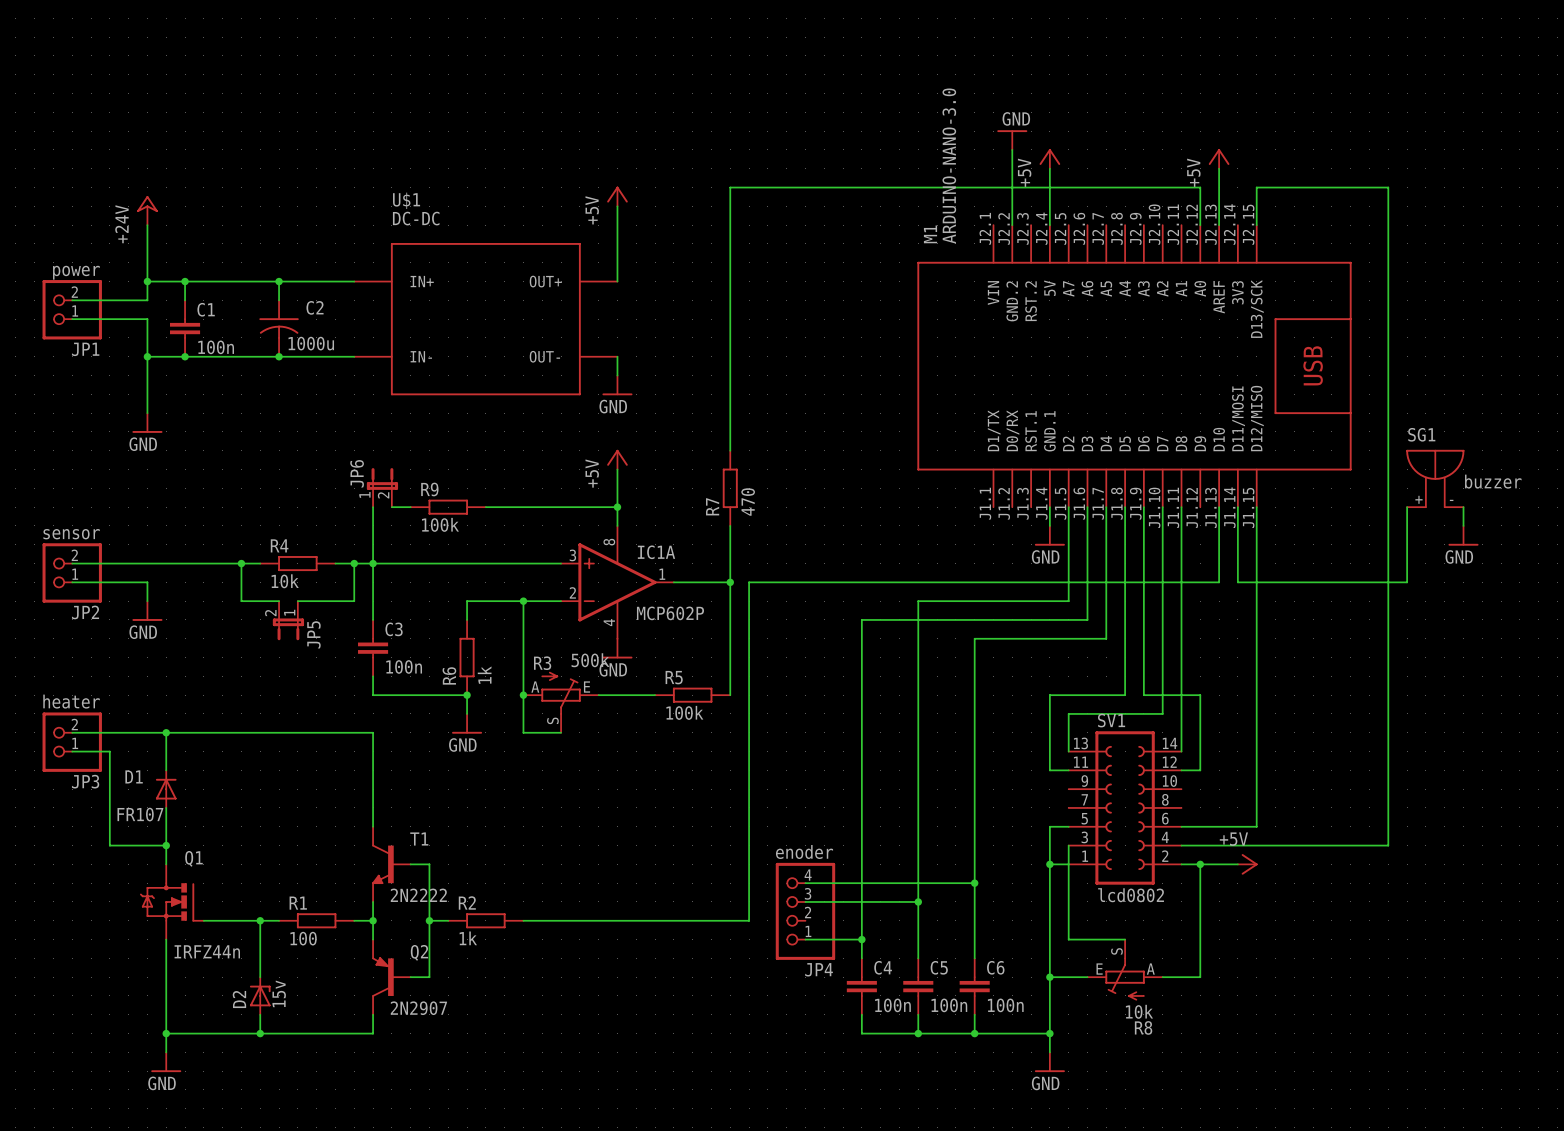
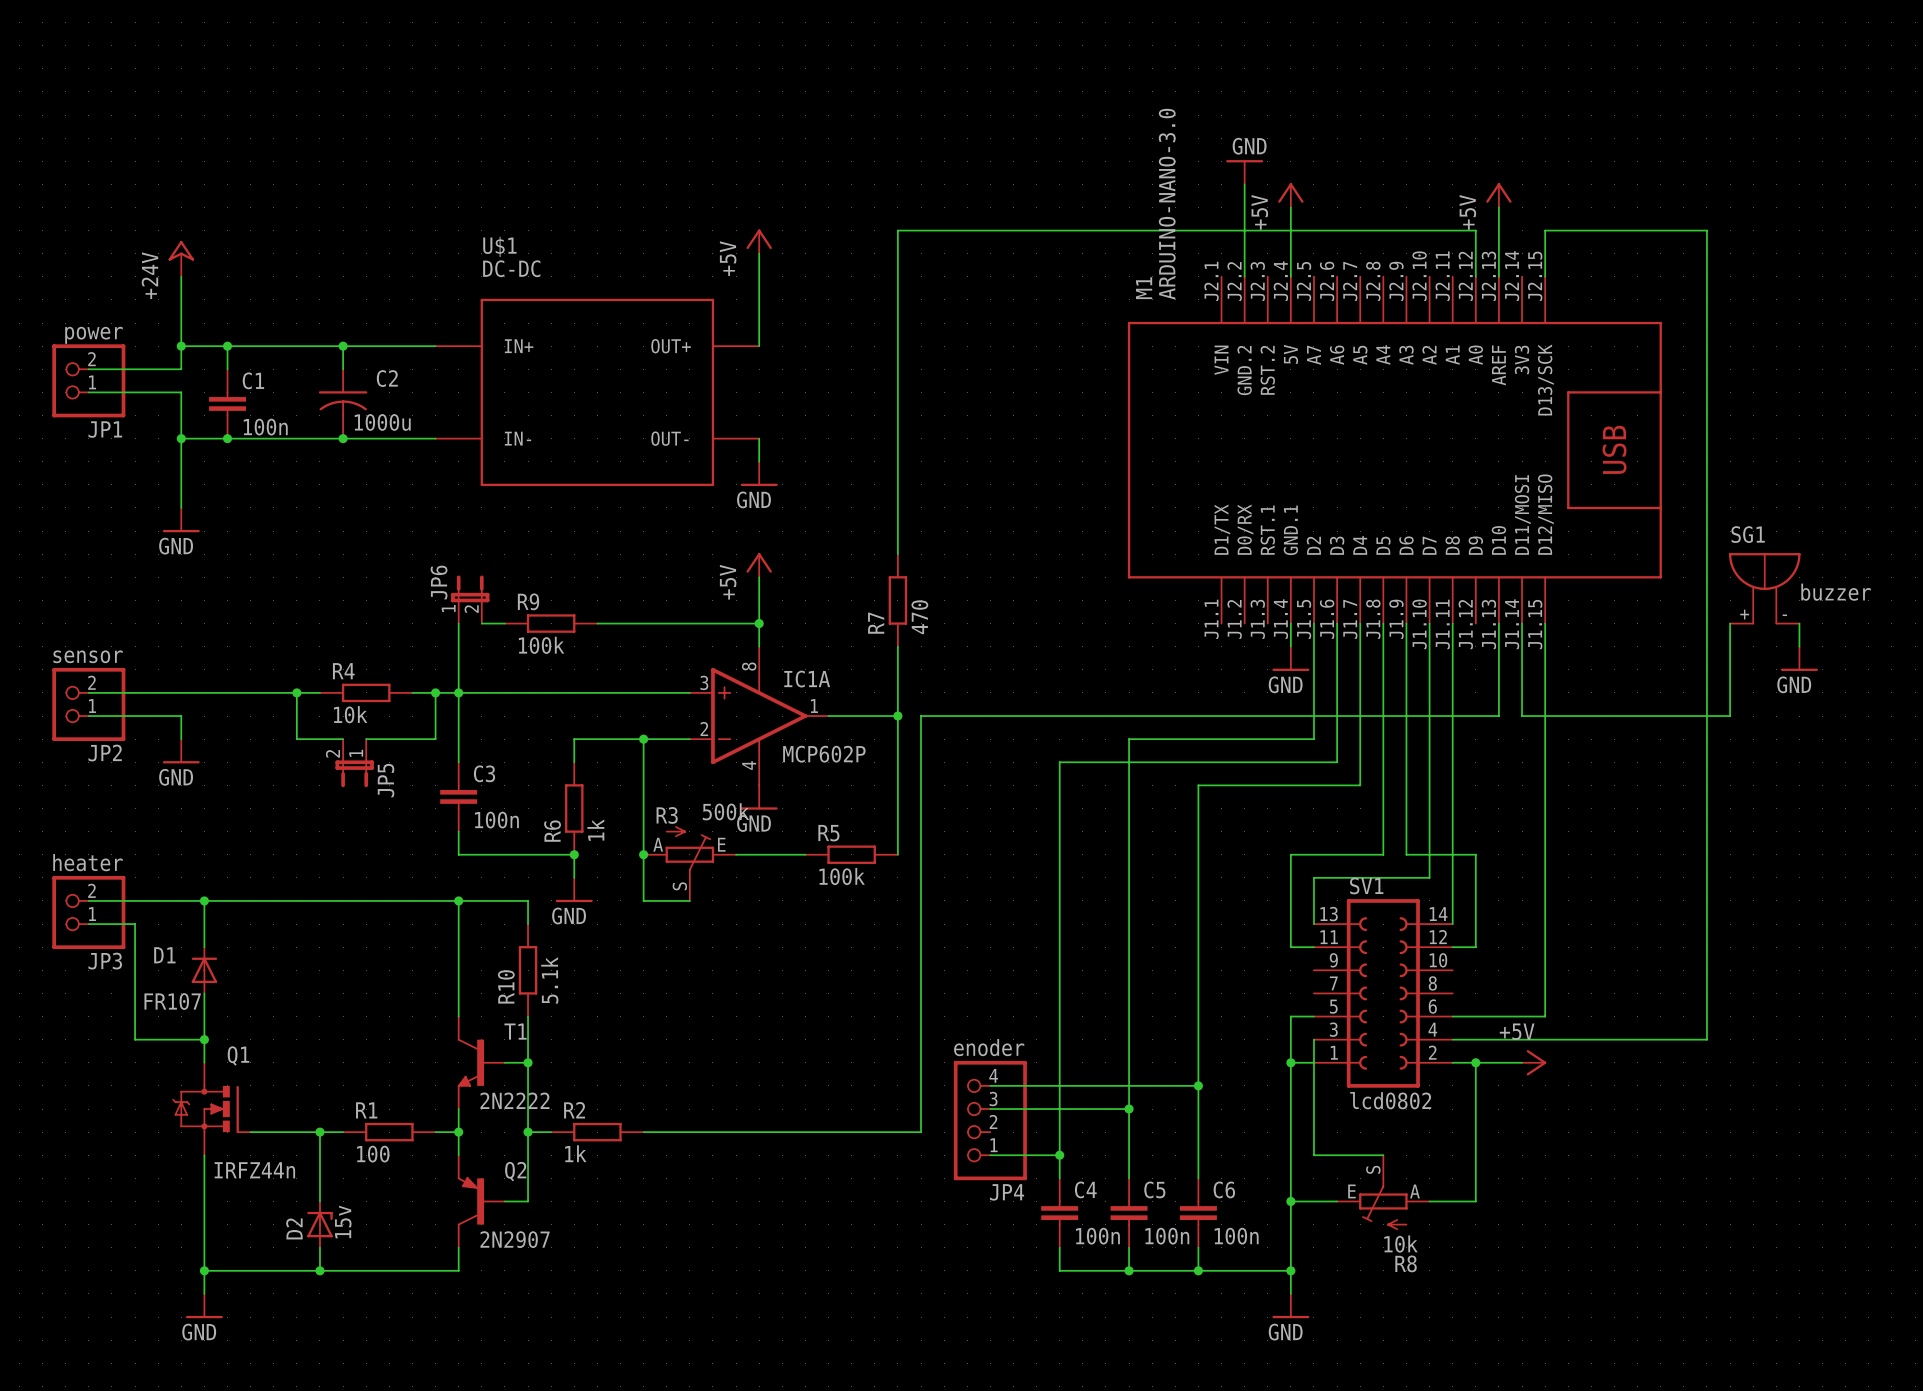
wire: none -> (458, 900) (528, 900) (528, 924)
junction: none -> (458, 900)
R10: none -> 5.1k (528, 970)
wire: none -> (528, 1016) (528, 1062)
junction: none -> (528, 1062)

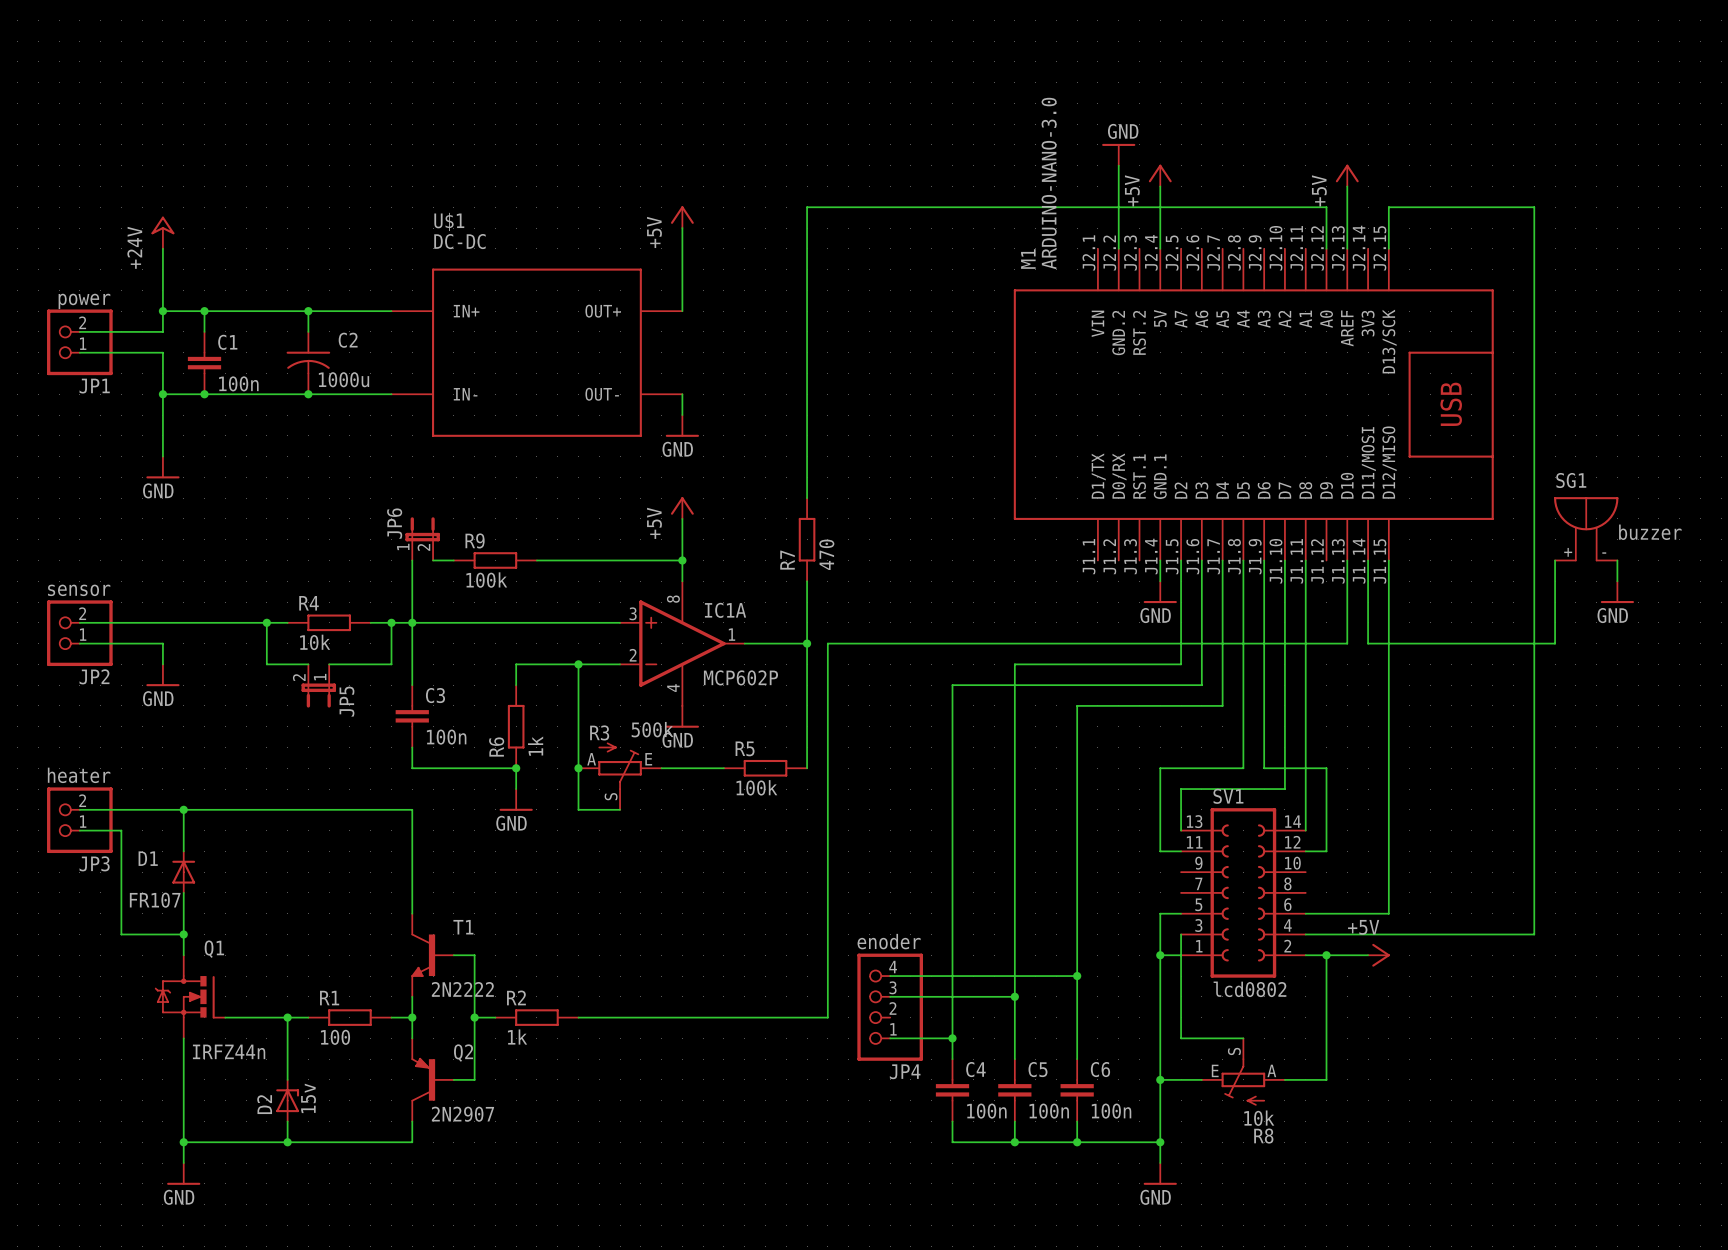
wire: (458, 900) (528, 900) (528, 924) -> none
junction: (458, 900) -> none
R10: 5.1k (528, 970) -> none
wire: (528, 1016) (528, 1062) -> none
junction: (528, 1062) -> none

